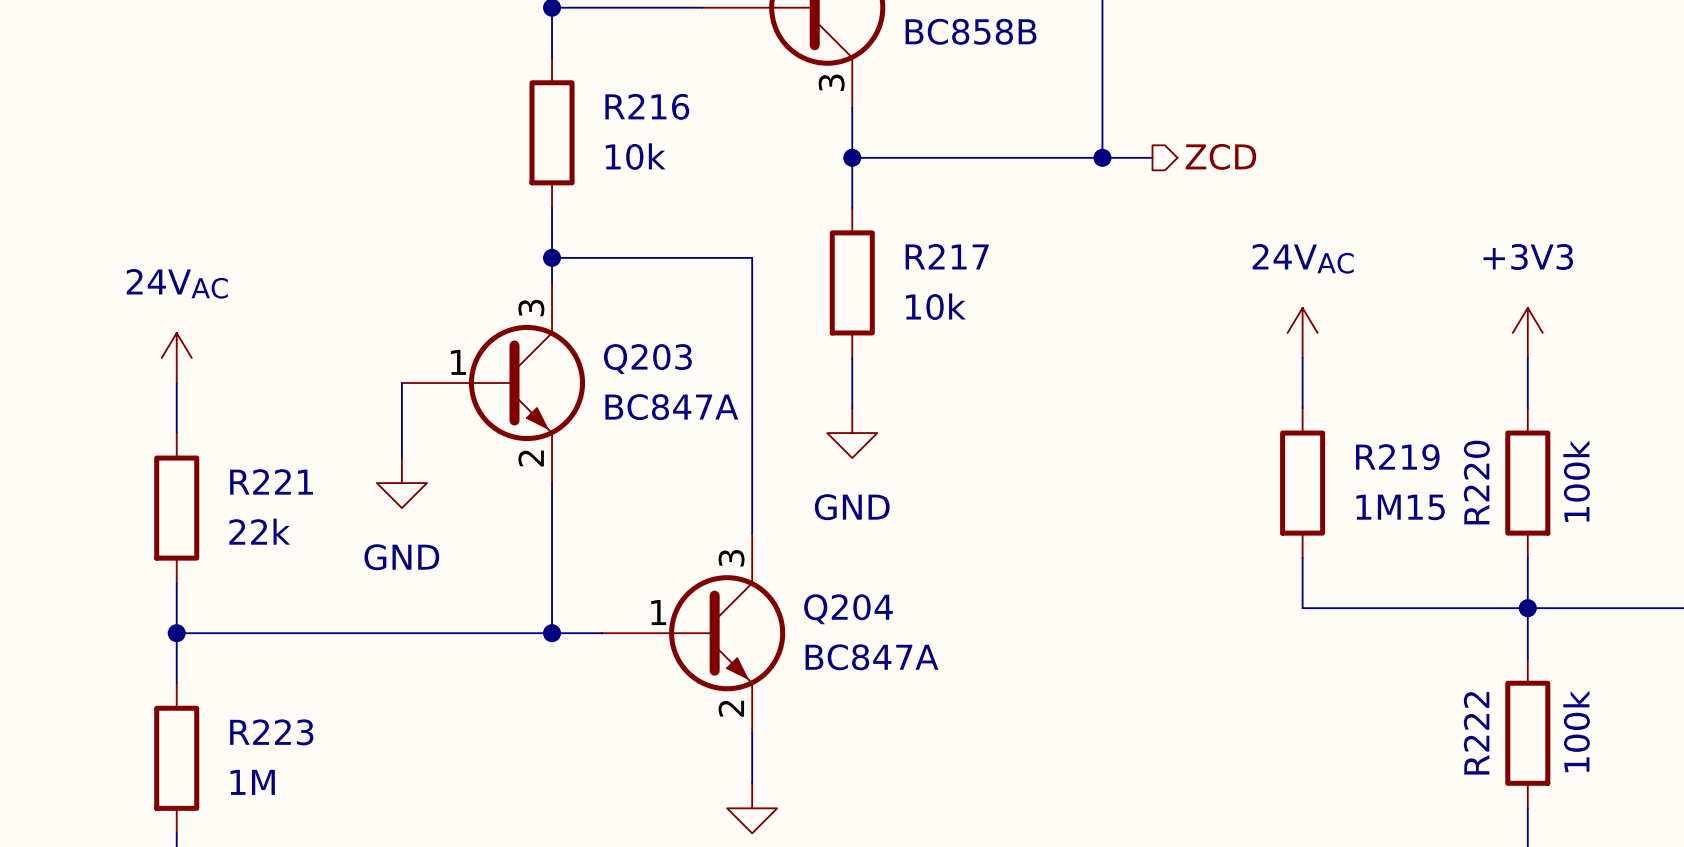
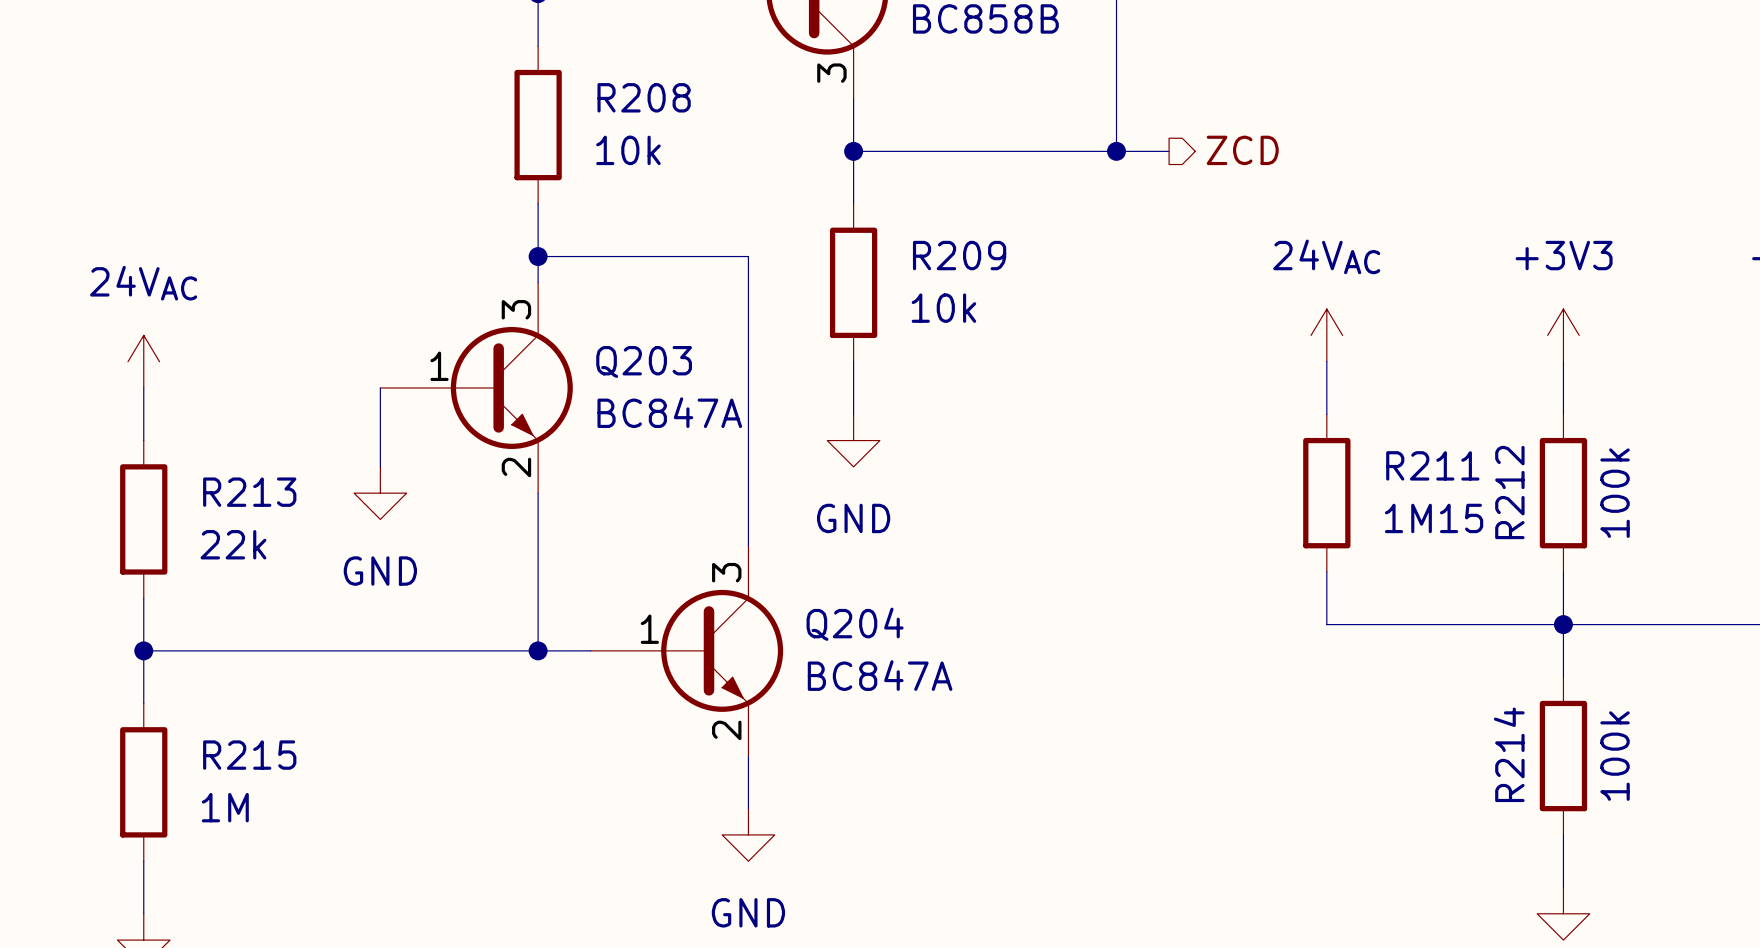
R216 name: R216 (647, 106) -> R208 (644, 97)
R217 name: R217 (947, 256) -> R209 (959, 255)
R219 name: R219 (1397, 457) -> R211 (1432, 465)
R221 name: R221 (271, 481) -> R213 (249, 492)
R220 name: R220 (1476, 482) -> R212 (1509, 492)
R223 name: R223 (271, 732) -> R215 (249, 755)
R222 name: R222 (1476, 733) -> R214 (1509, 754)

